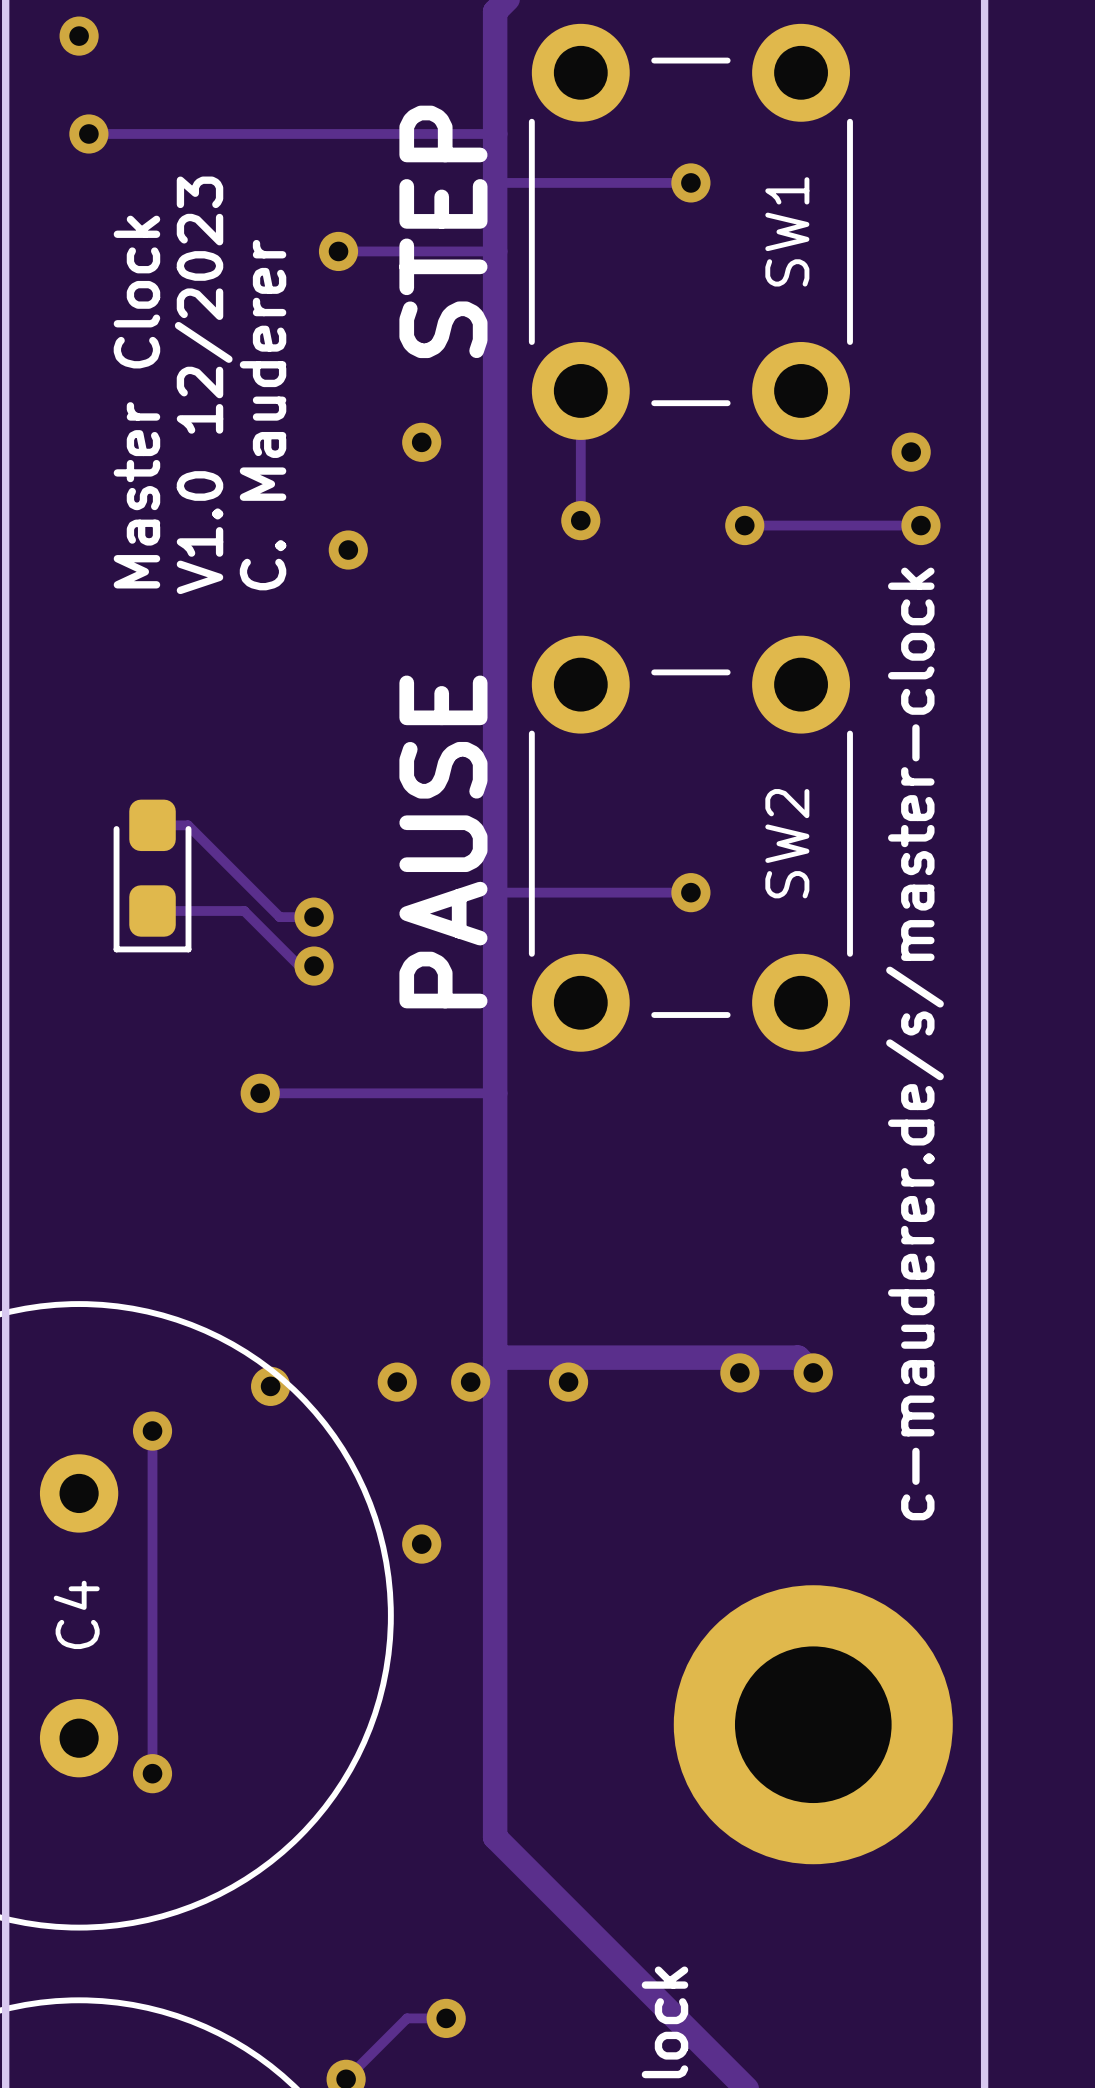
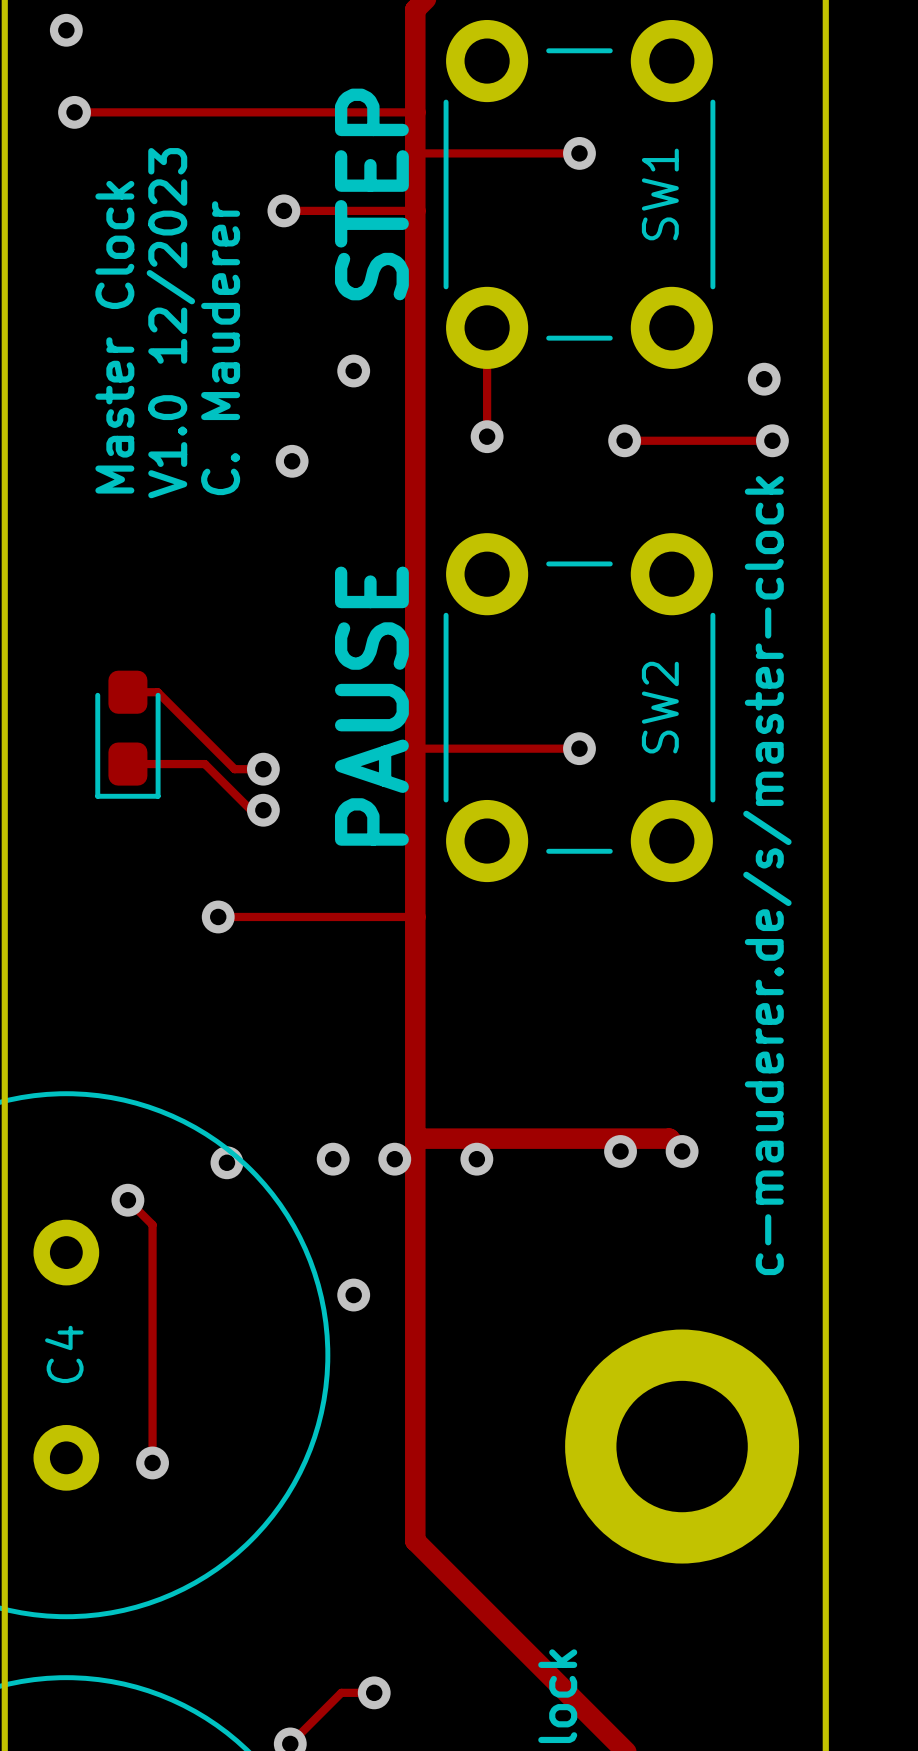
track: (152, 1431) (152, 1773) -> (127, 1200) (152, 1224) (152, 1462)
via position: (152, 1773) -> (152, 1462)

